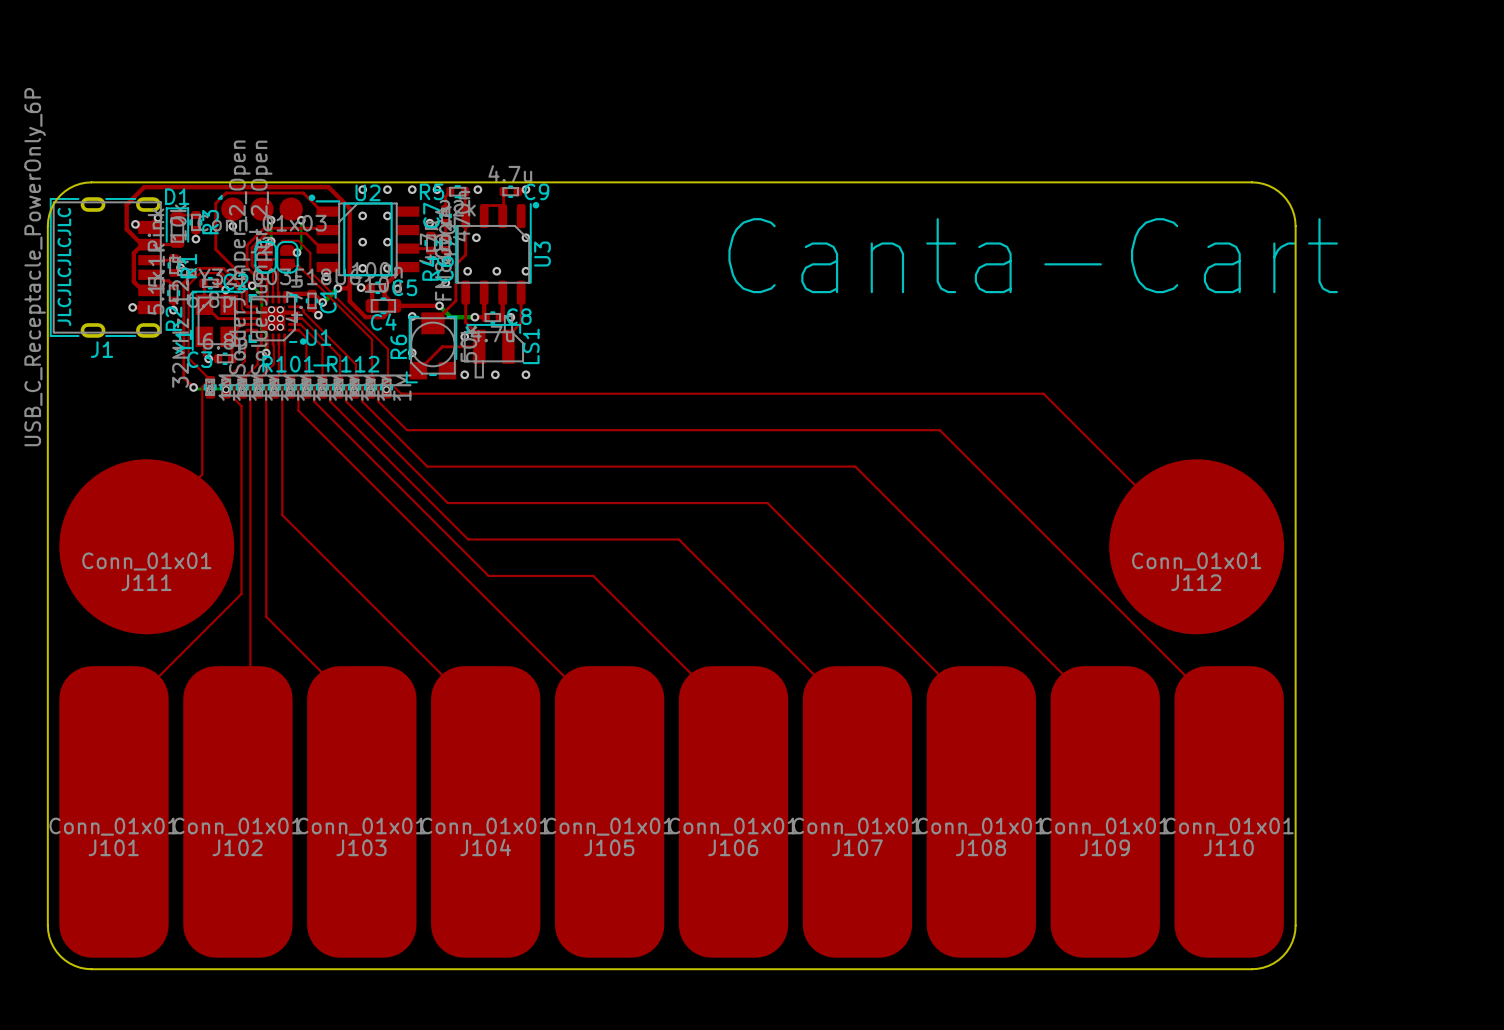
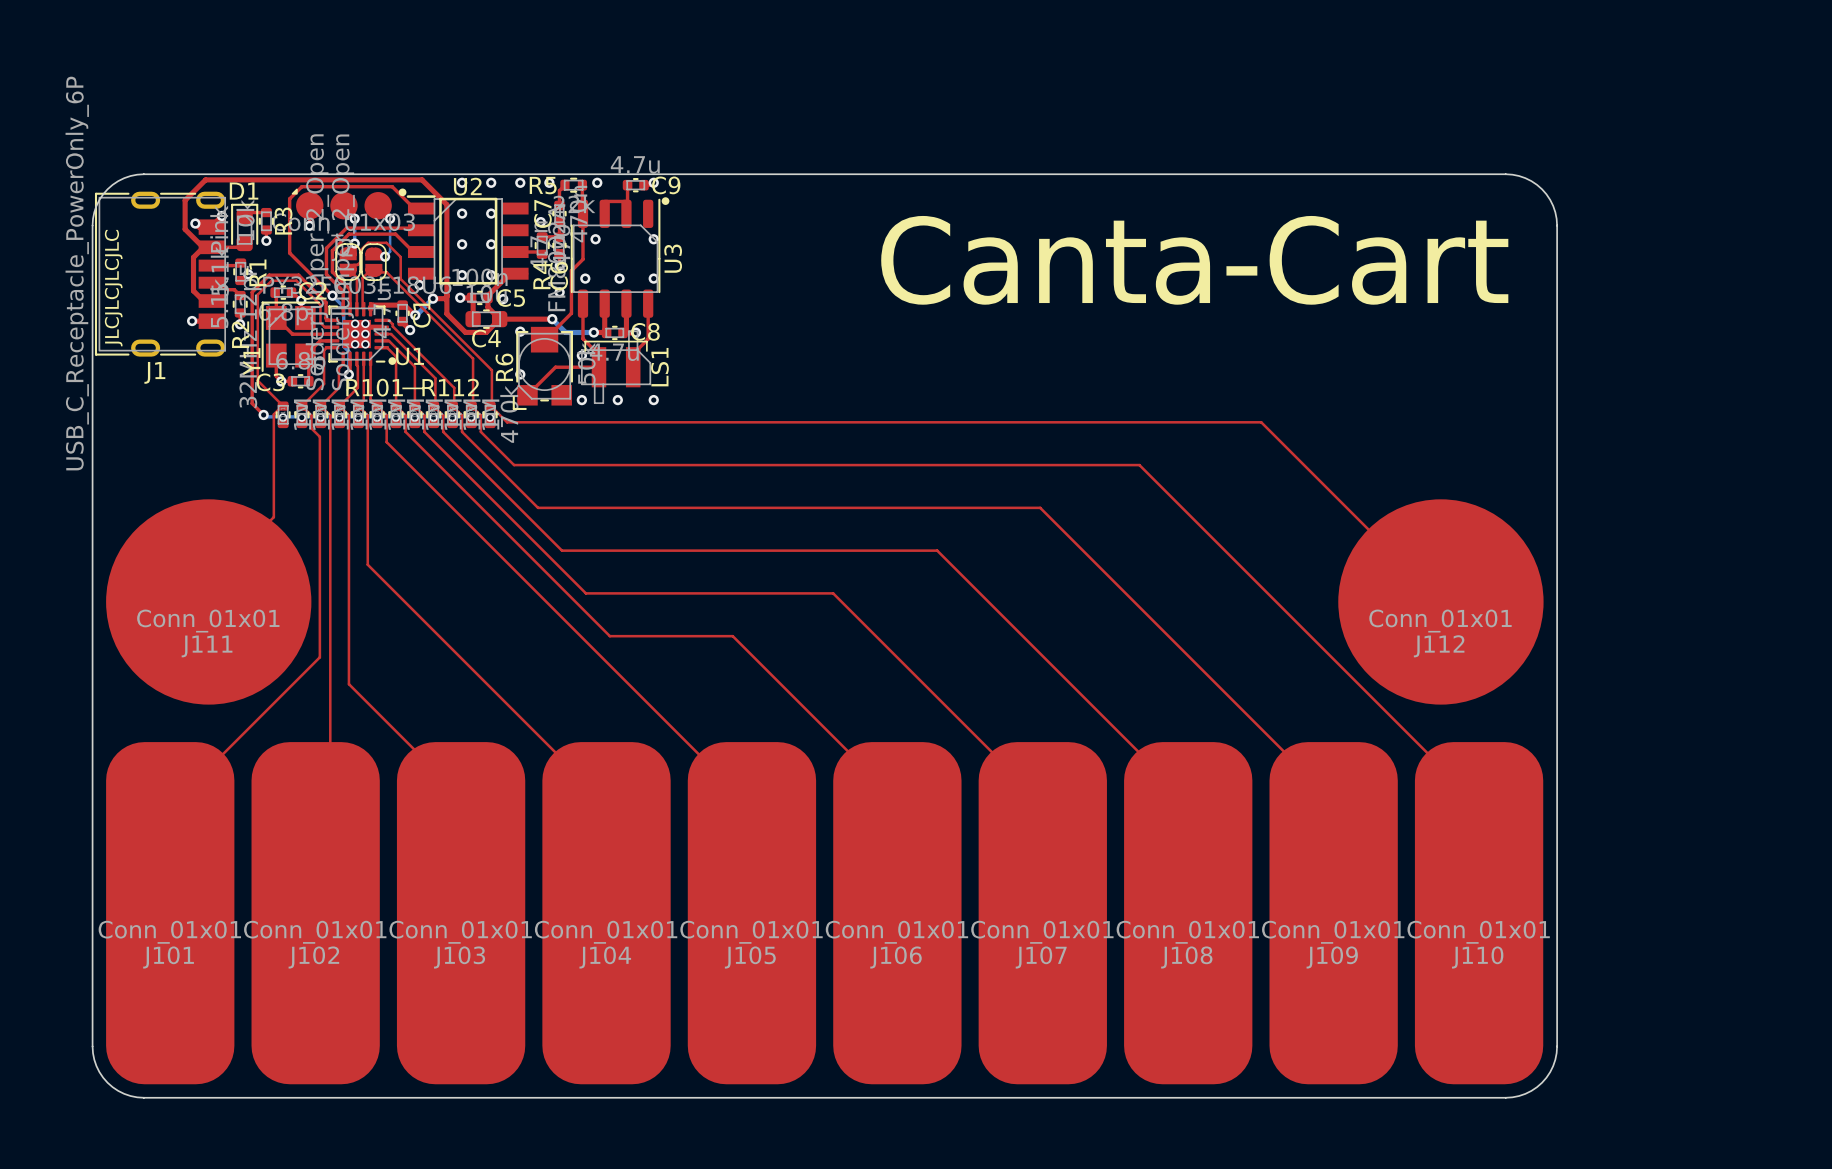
R112 value: 1M (403, 387) -> 470k (509, 414)

